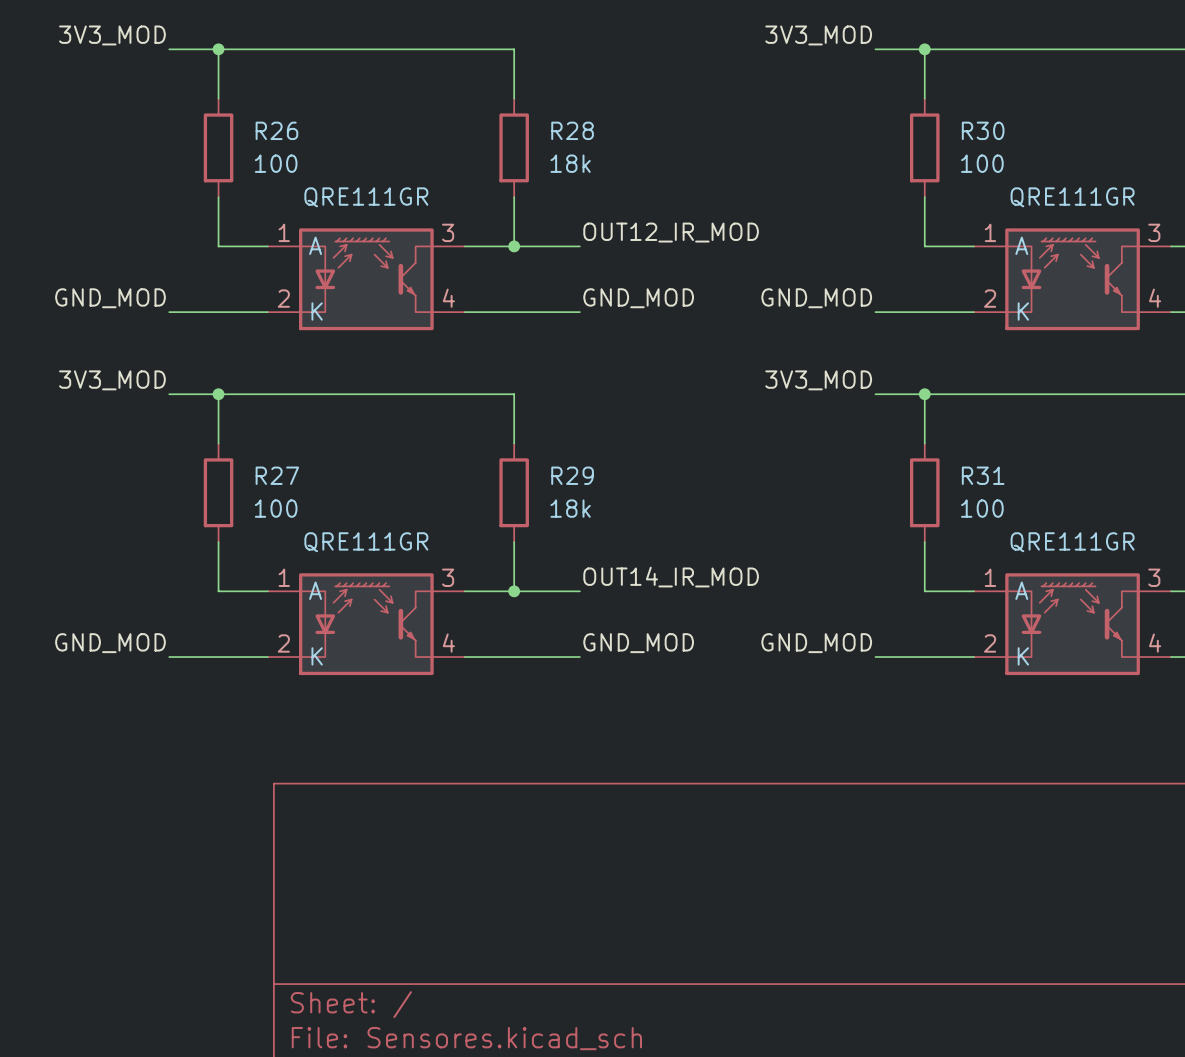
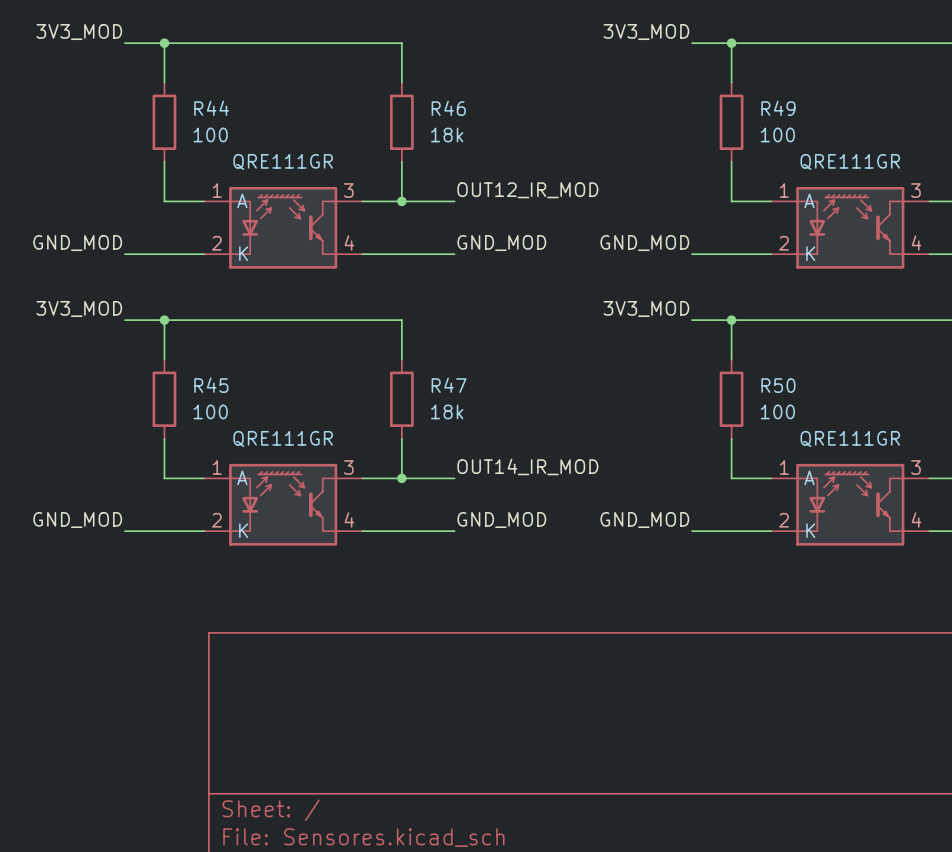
R26 name: R26 (276, 130) -> R44 (211, 108)
R28 name: R28 (572, 130) -> R46 (448, 108)
R30 name: R30 (983, 130) -> R49 (778, 108)
R27 name: R27 (277, 475) -> R45 (211, 385)
R29 name: R29 (572, 475) -> R47 (449, 385)
R31 name: R31 (983, 475) -> R50 (778, 385)

